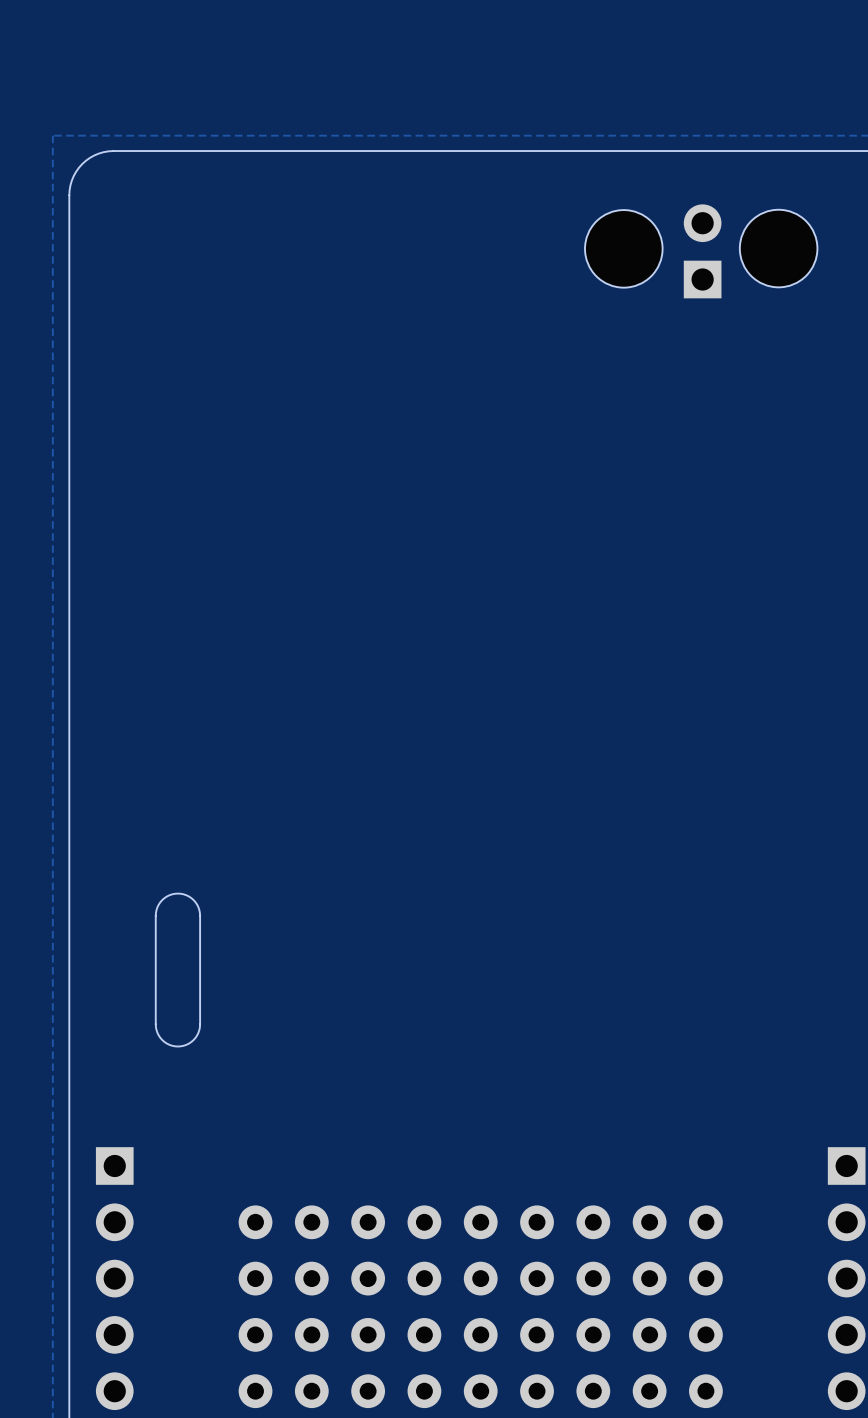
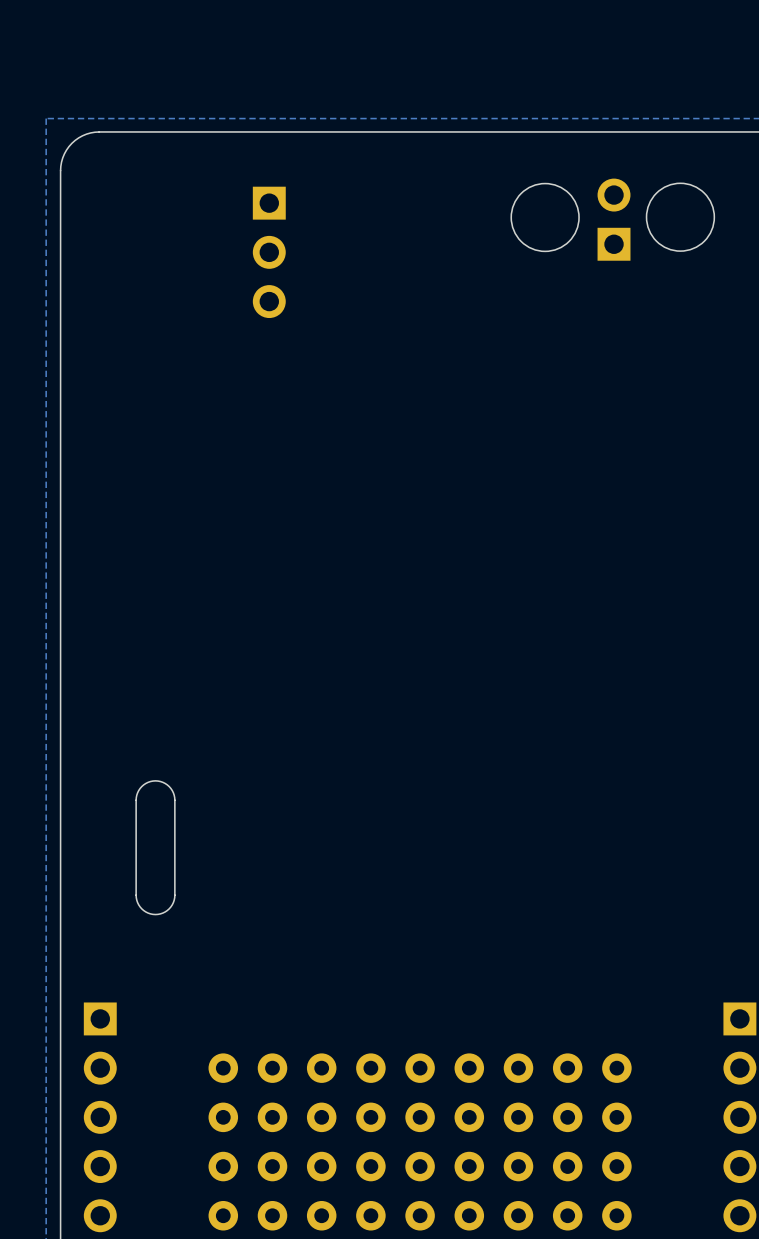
part: none -> (269, 252)

